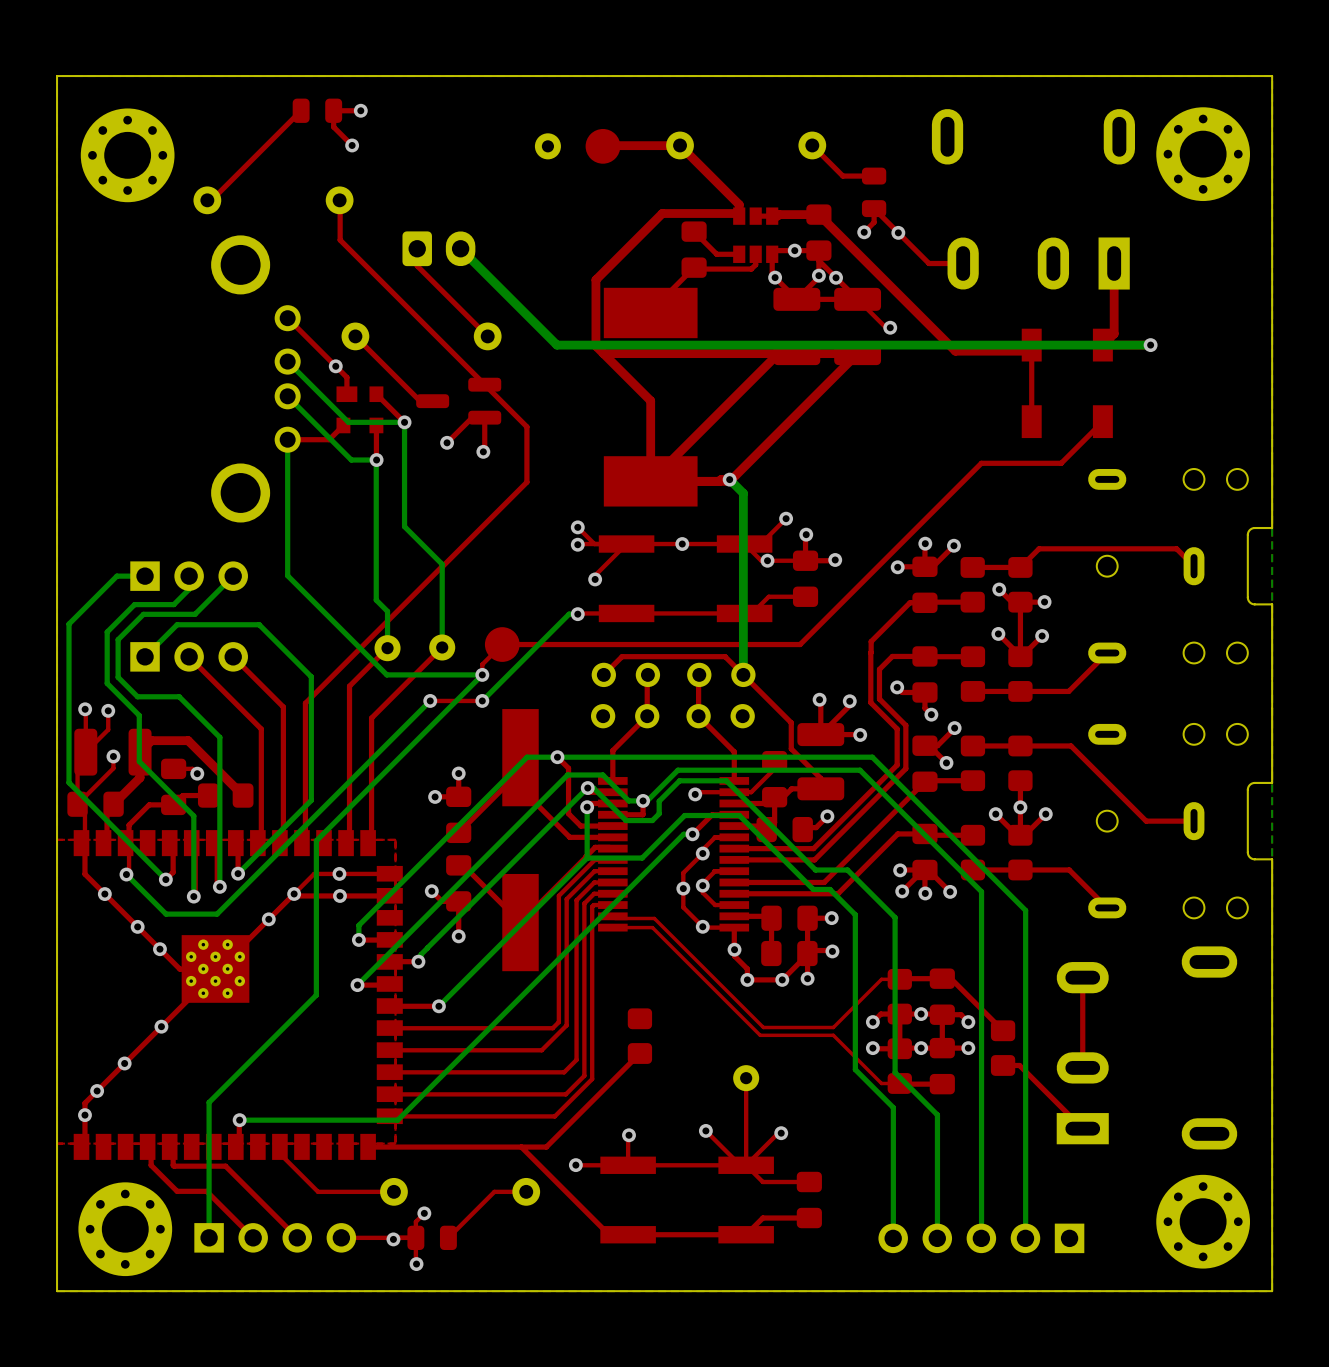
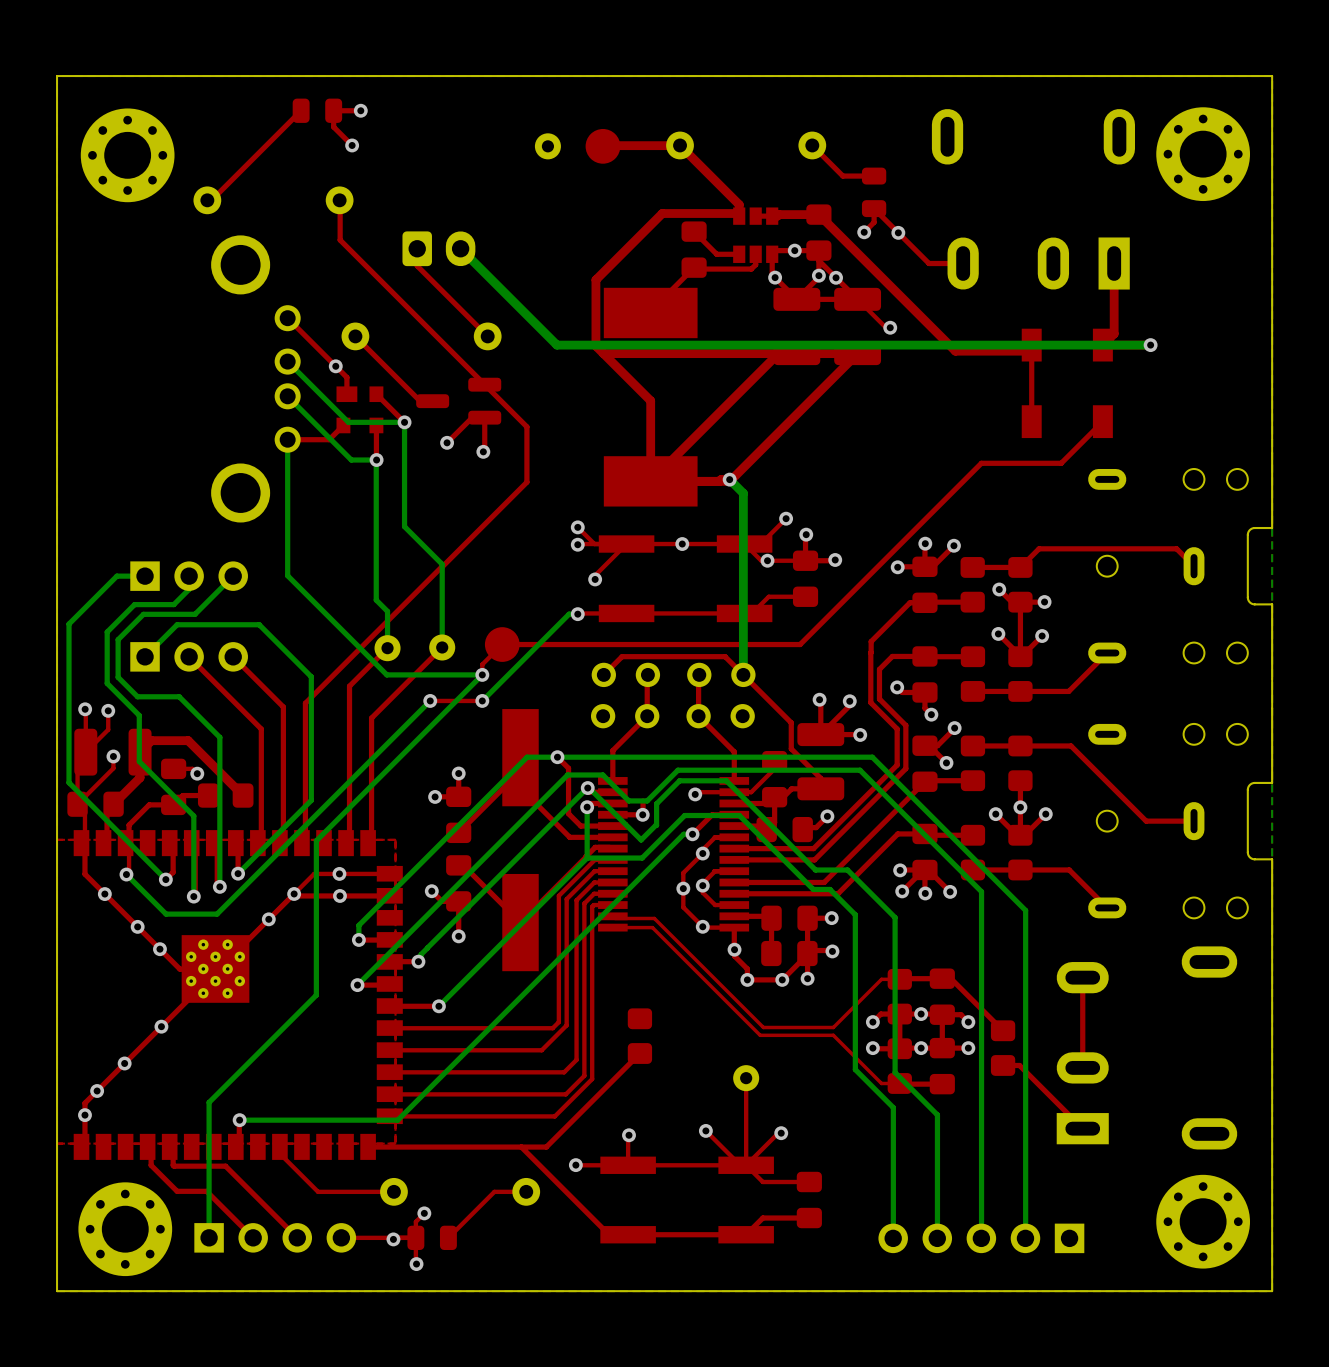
bottom track: (589, 788) (593, 788) (626, 820) (652, 820) (659, 813) (659, 801) -> (589, 788) (641, 839) (656, 825) (656, 803) (659, 801)
via position: (643, 800) -> (642, 814)

